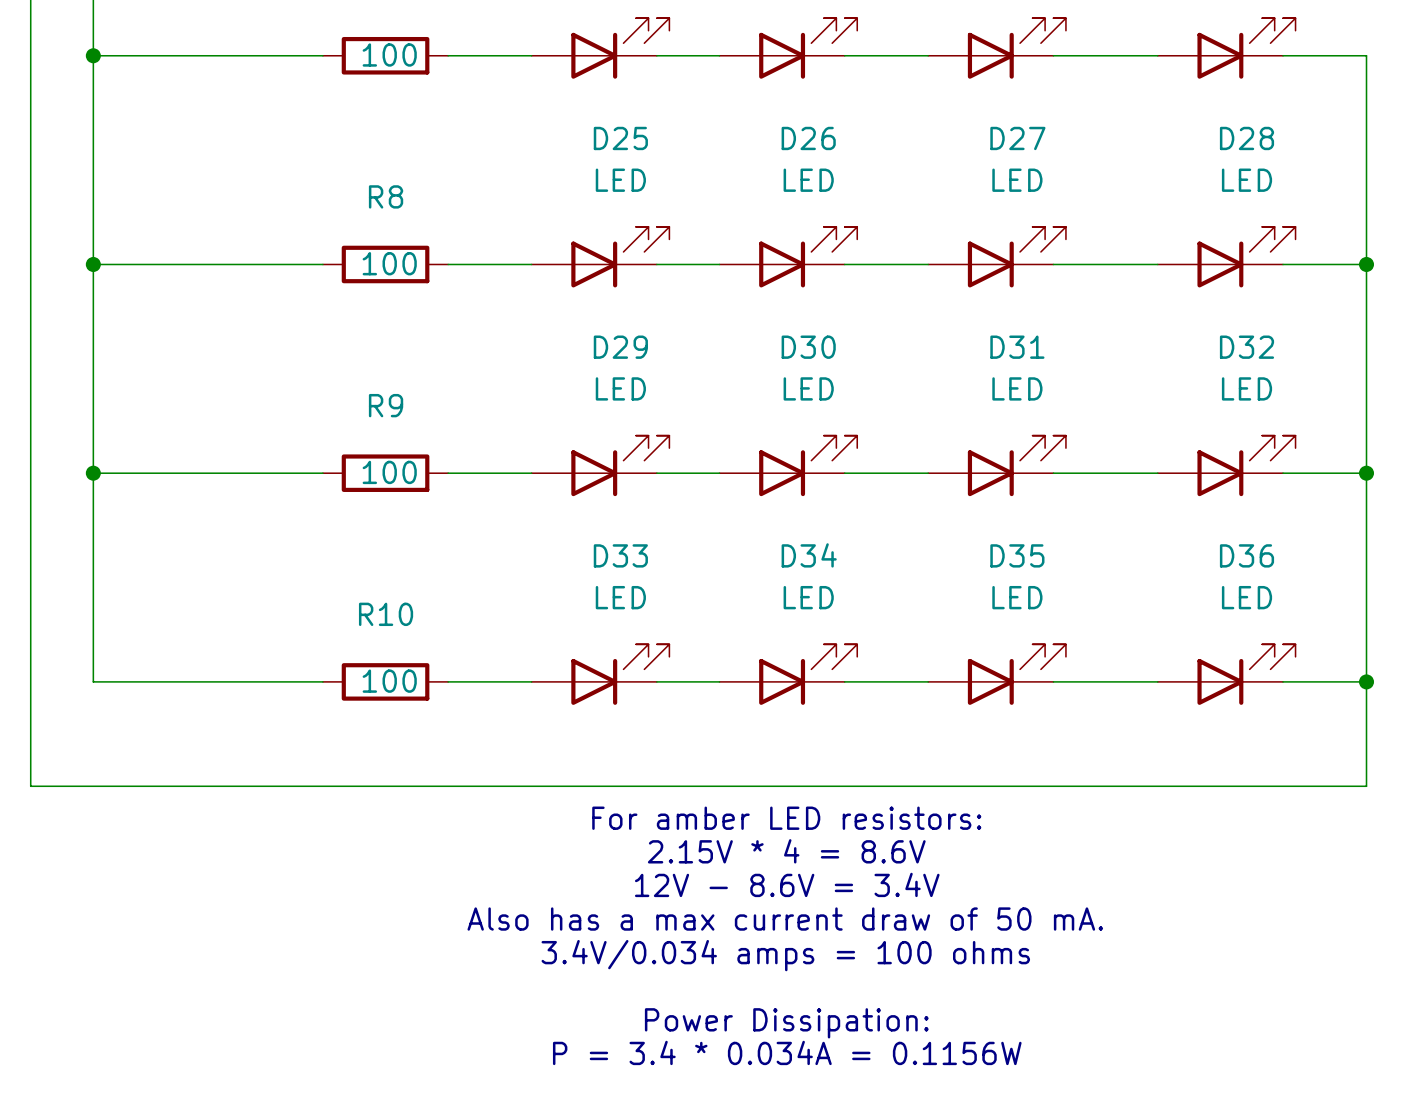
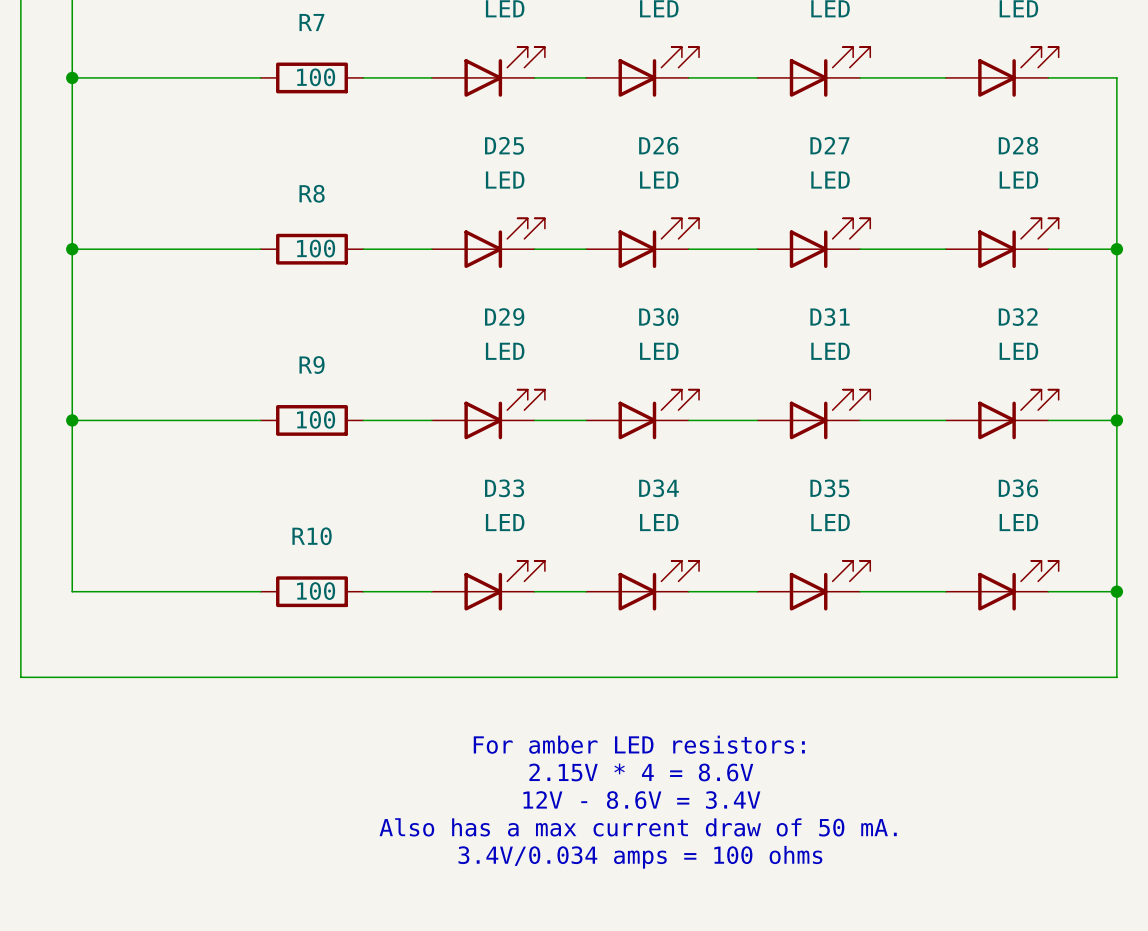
text position: For amber LED resistors: (786, 818) -> For amber LED resistors: (639, 744)
text position: 2.15V * 4 = 8.6V (786, 851) -> 2.15V * 4 = 8.6V (641, 772)
text position: 12V - 8.6V = 3.4V (787, 884) -> 12V - 8.6V = 3.4V (641, 800)
text position: Also has a max current draw of 50 mA. (785, 919) -> Also has a max current draw of 50 mA. (638, 827)
text position: 3.4V/0.034 amps = 100 ohms (785, 955) -> 3.4V/0.034 amps = 100 ohms (640, 857)
text: Power Dissipation: (786, 1023) -> none
text: P = 3.4 * 0.034A = 0.1156W (787, 1052) -> none

